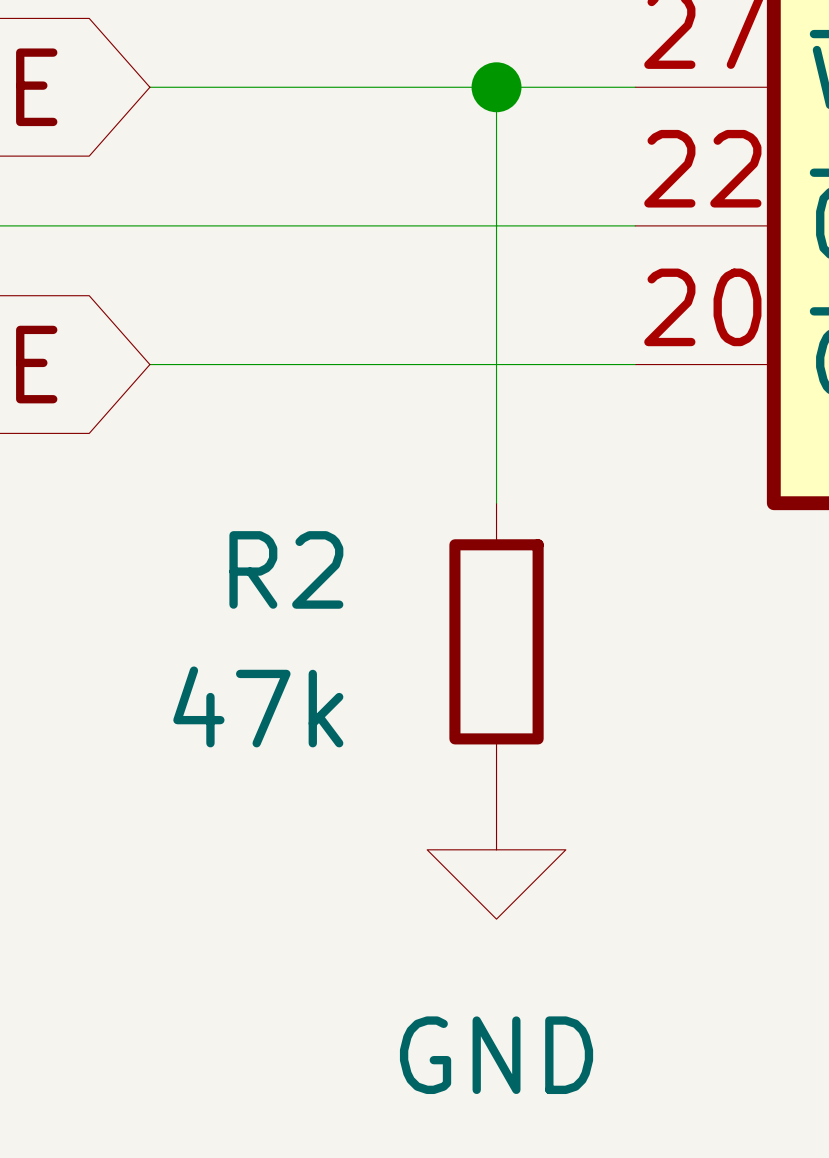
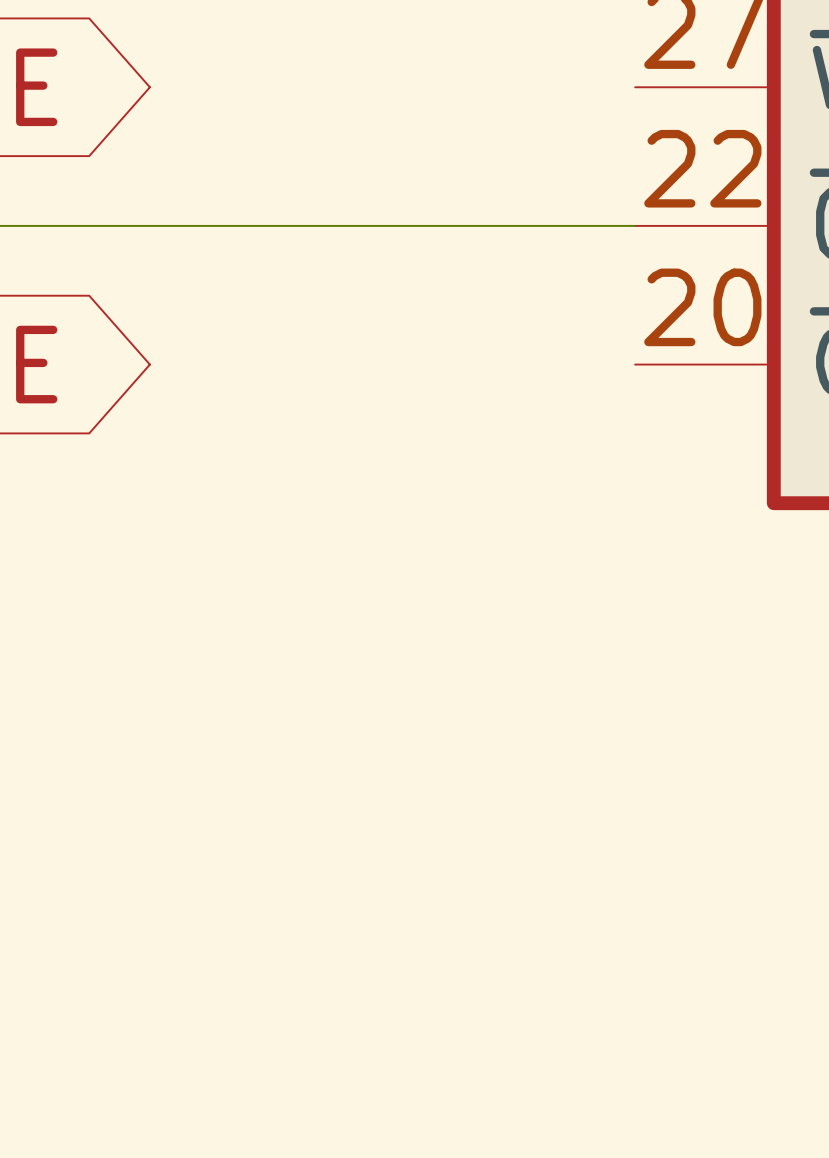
wire: (149, 87) (635, 87) -> none
wire: (496, 87) (496, 503) -> none
junction: (496, 87) -> none
wire: (149, 364) (635, 364) -> none
R2: 47k (496, 641) -> none
power symbol: GND (496, 849) -> none

